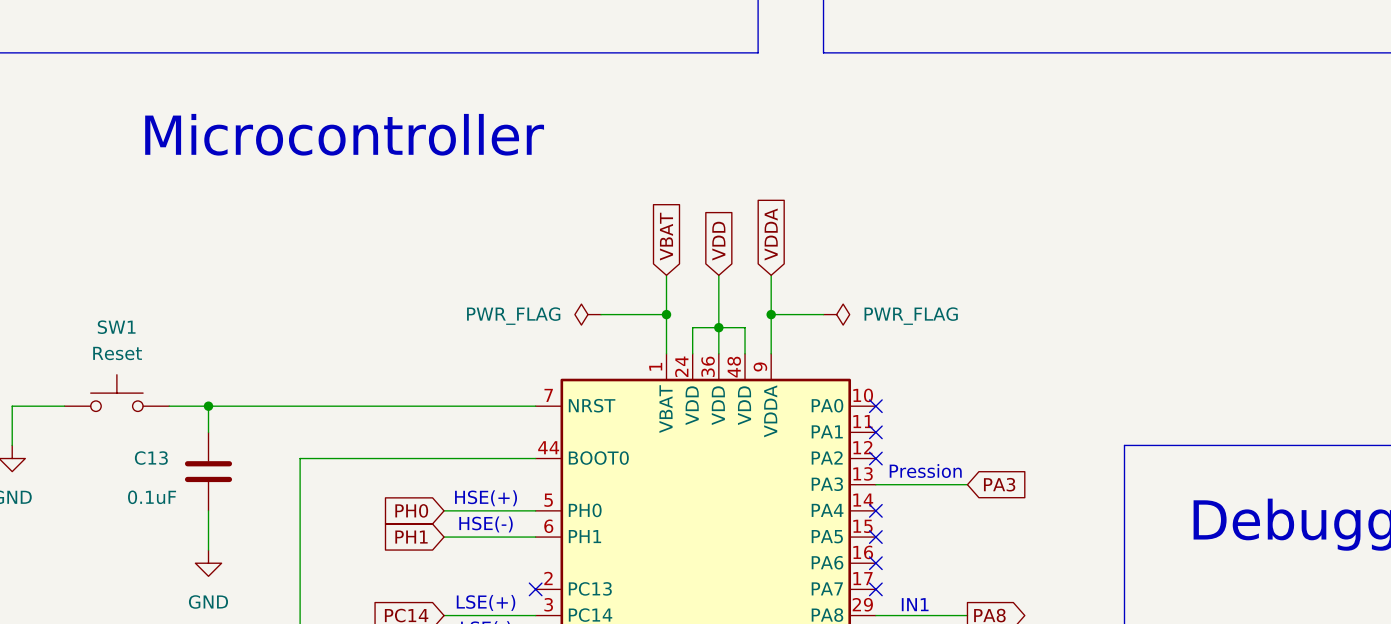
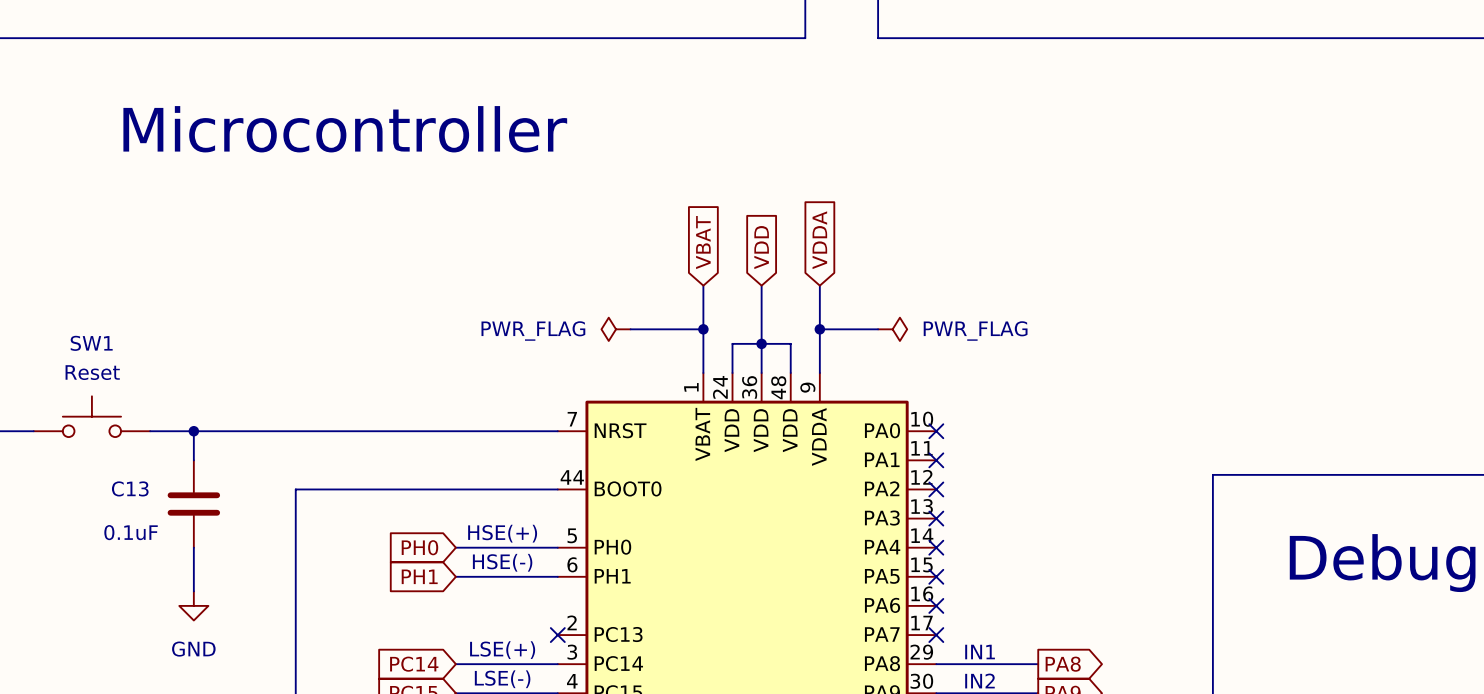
text: Pression (925, 471) -> none
wire: (875, 484) (967, 484) -> none
no-connect mark: none -> (936, 518)
global label: PA3 (999, 484) -> none

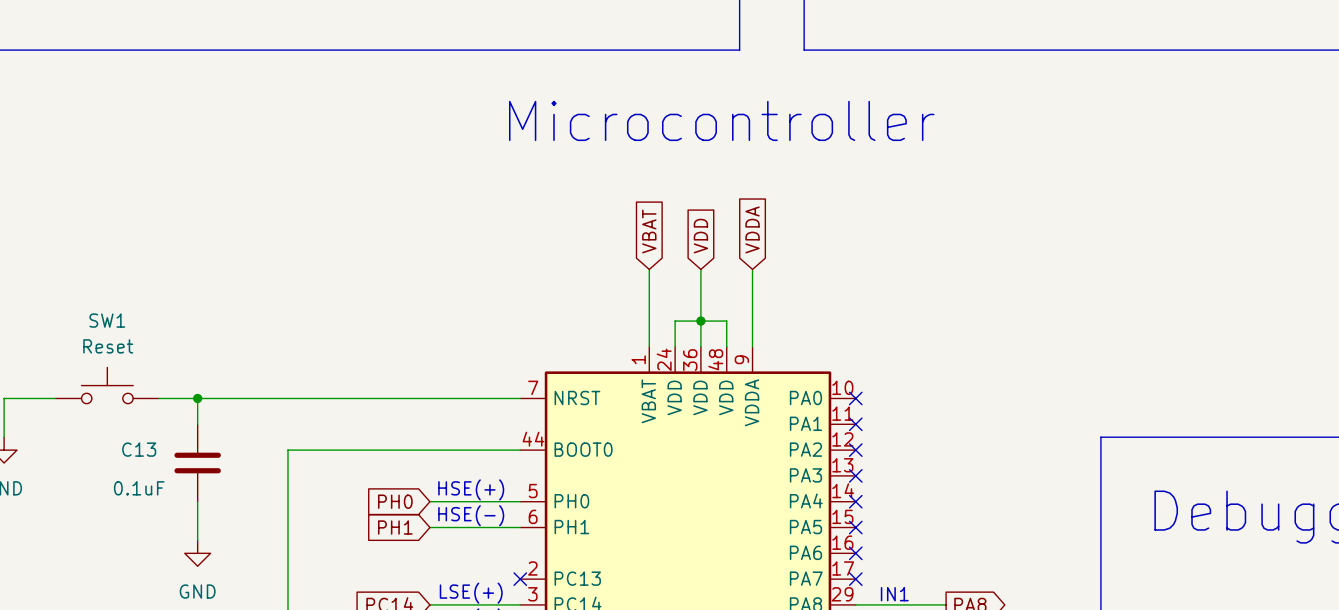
text: none -> Microcontroller (721, 120)
text: Microcontroller (345, 129) -> none
power symbol: PWR_FLAG (616, 329) -> none
wire: (630, 329) (703, 329) -> none
junction: (703, 329) -> none
wire: (819, 329) (878, 329) -> none
junction: (819, 329) -> none
power symbol: PWR_FLAG (892, 329) -> none

